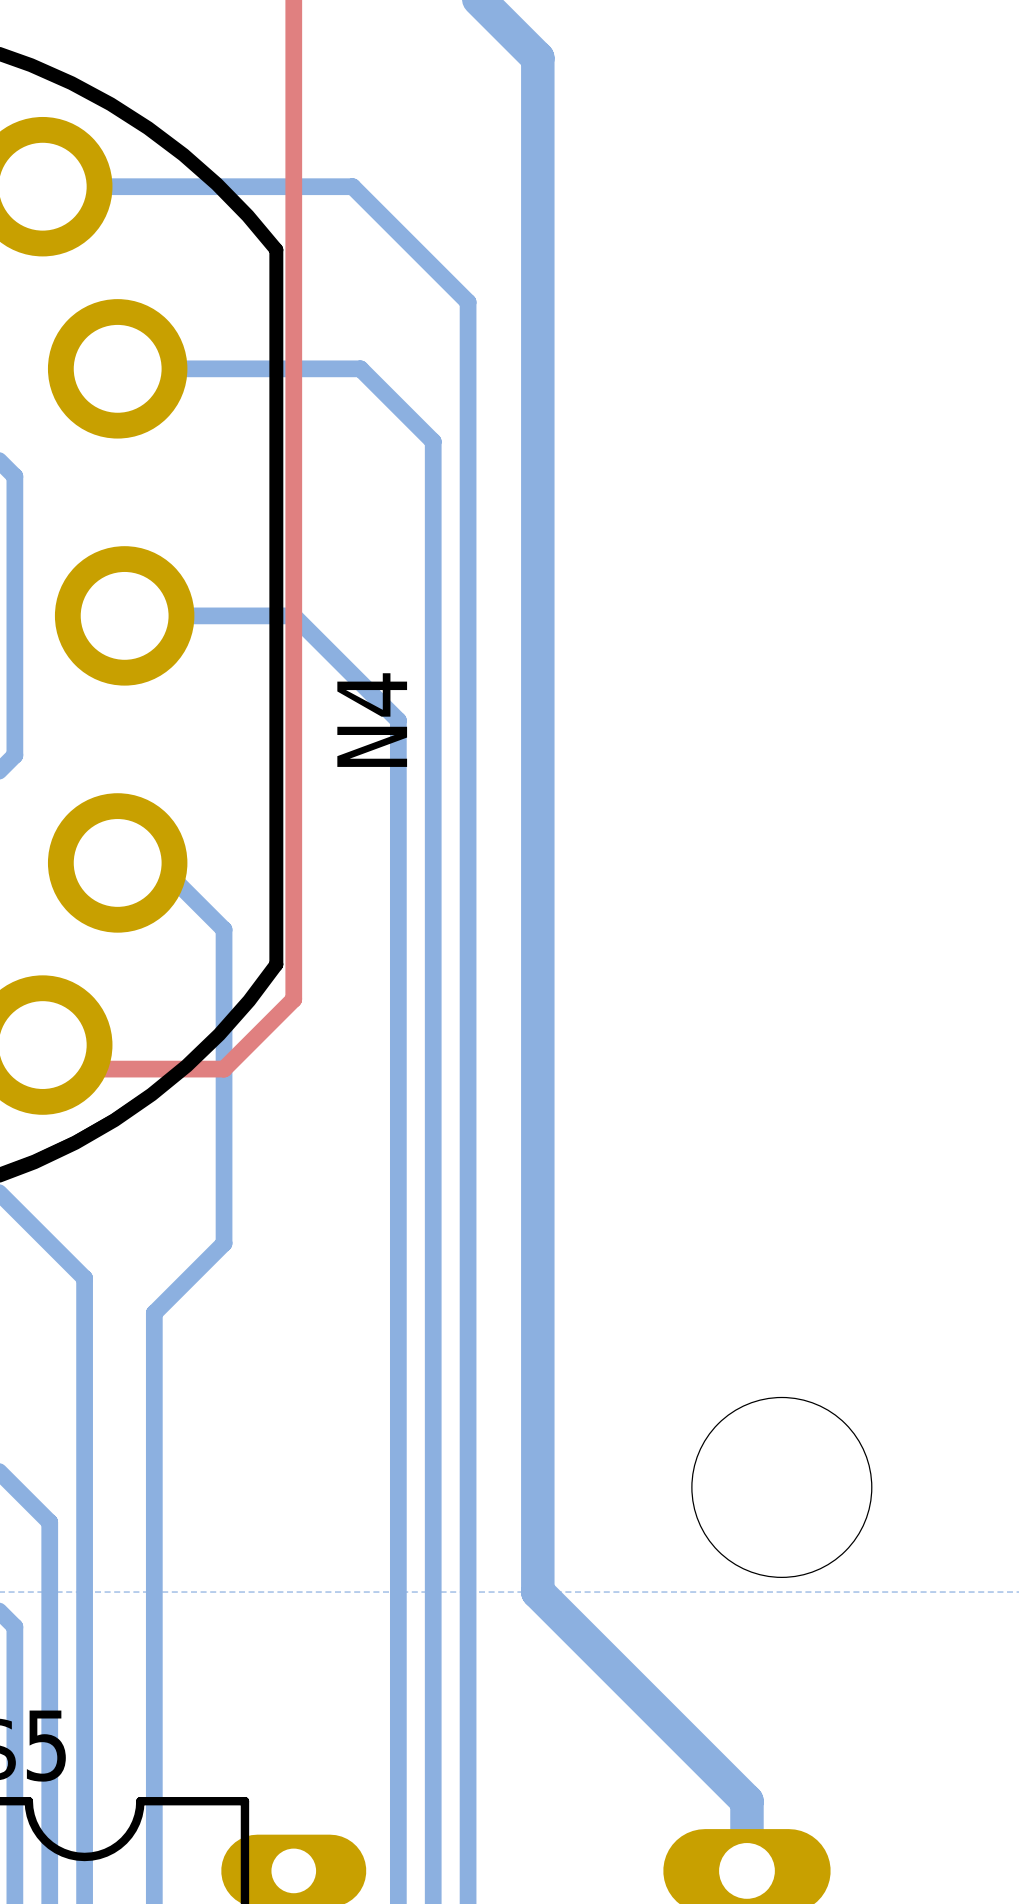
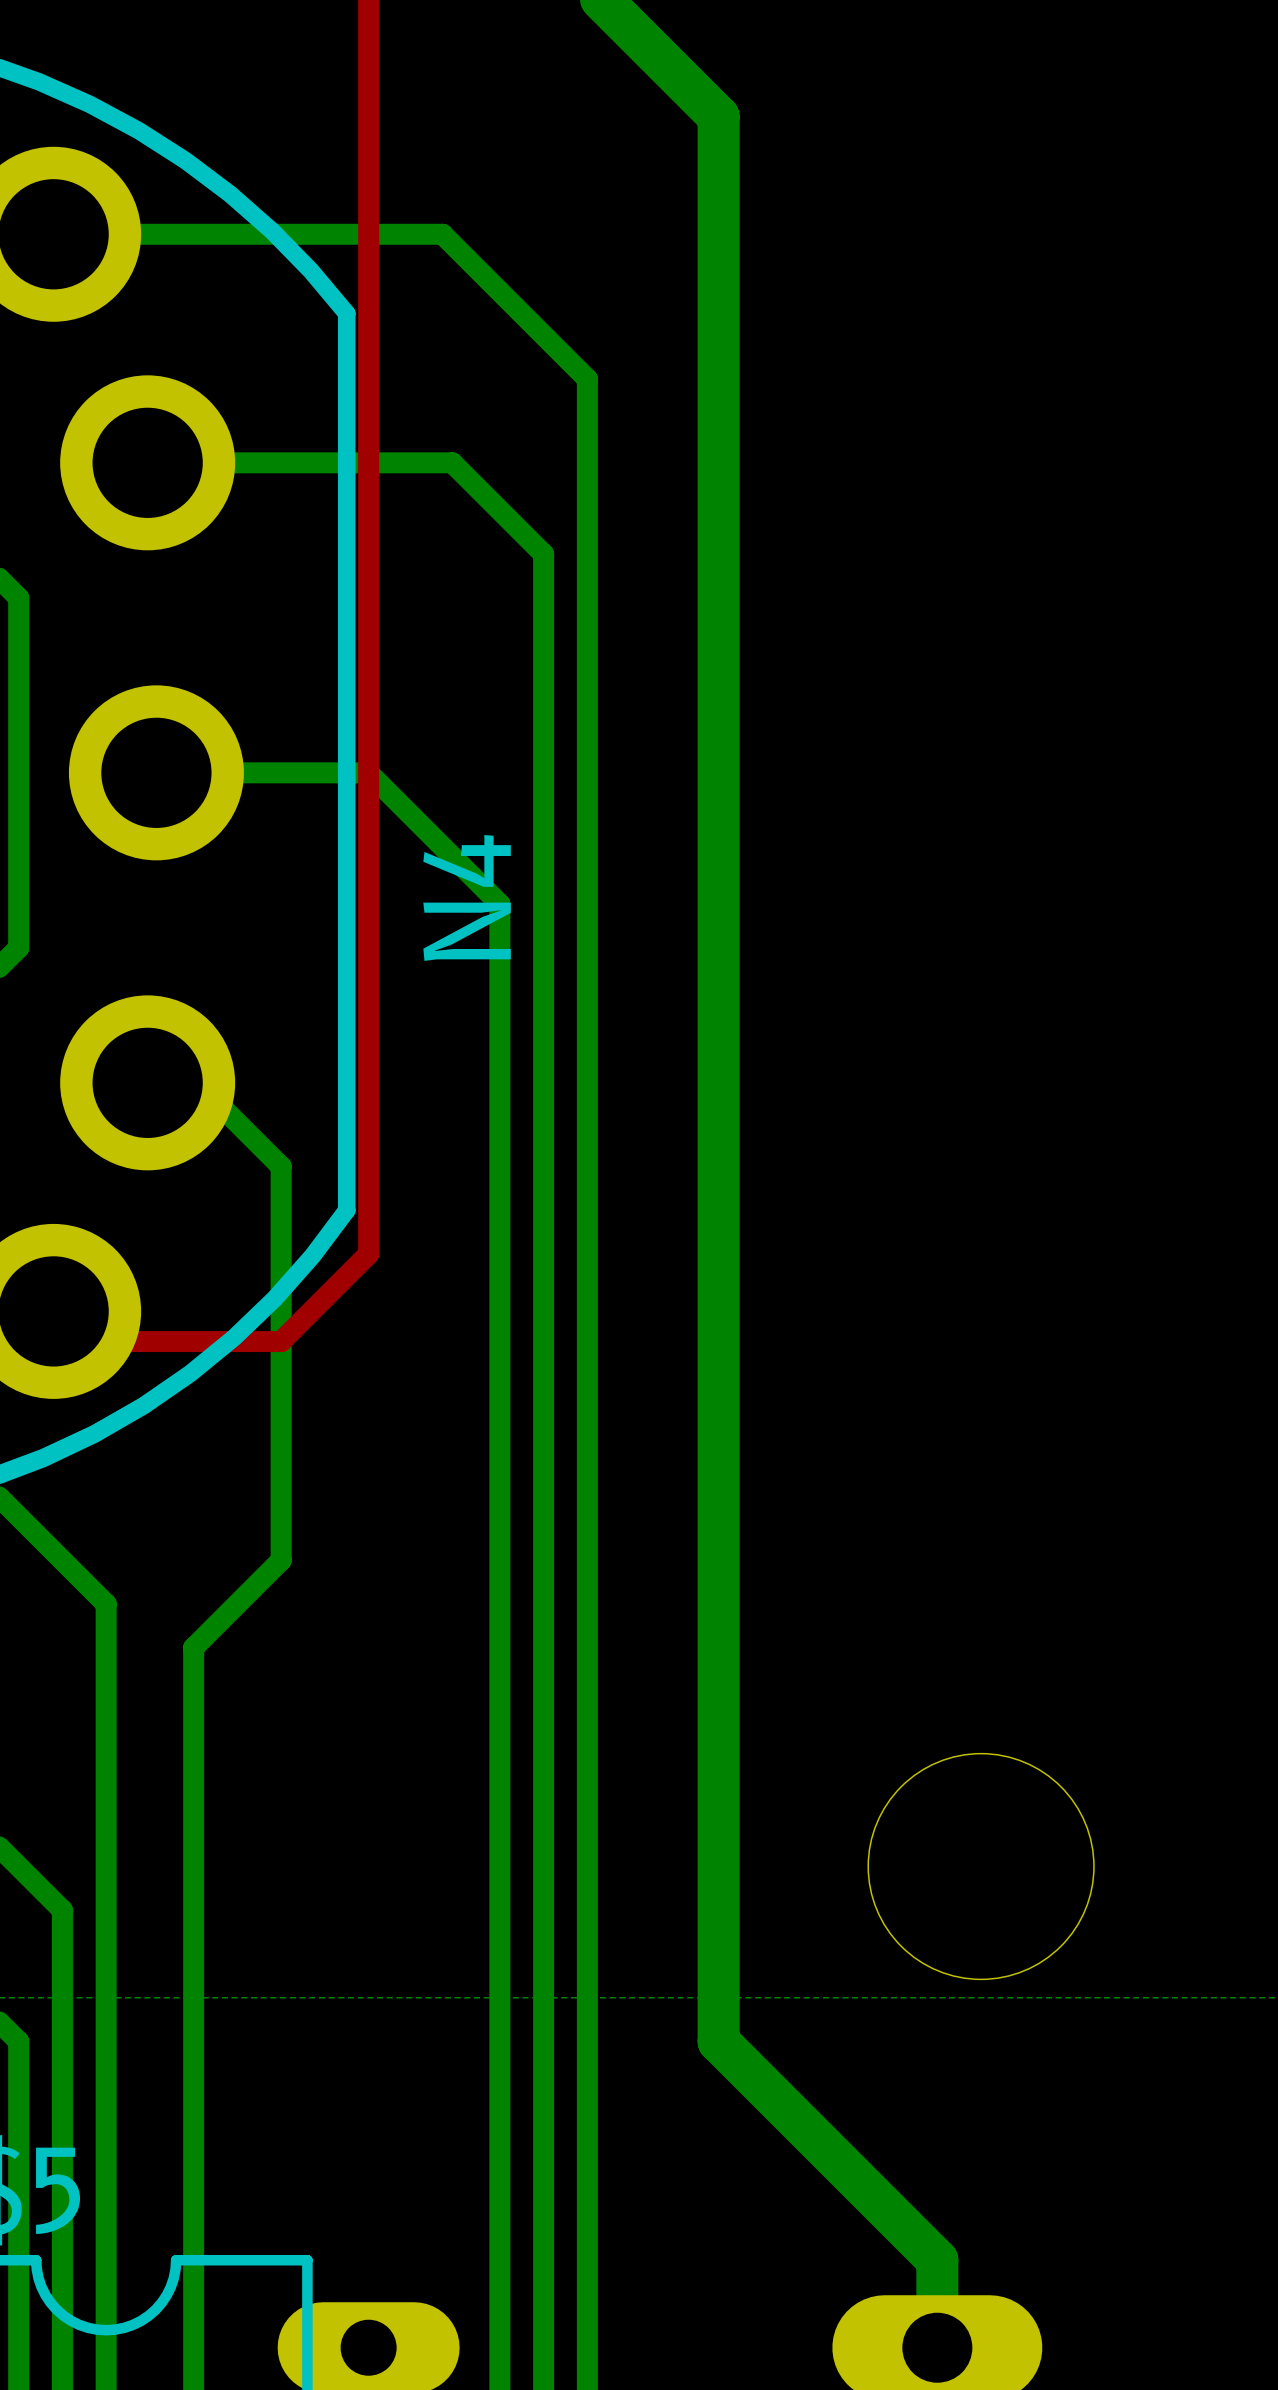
bottom track: (537, 58) (537, 1592) (572, 1626) -> (674, 72) (718, 116) (718, 2041)

